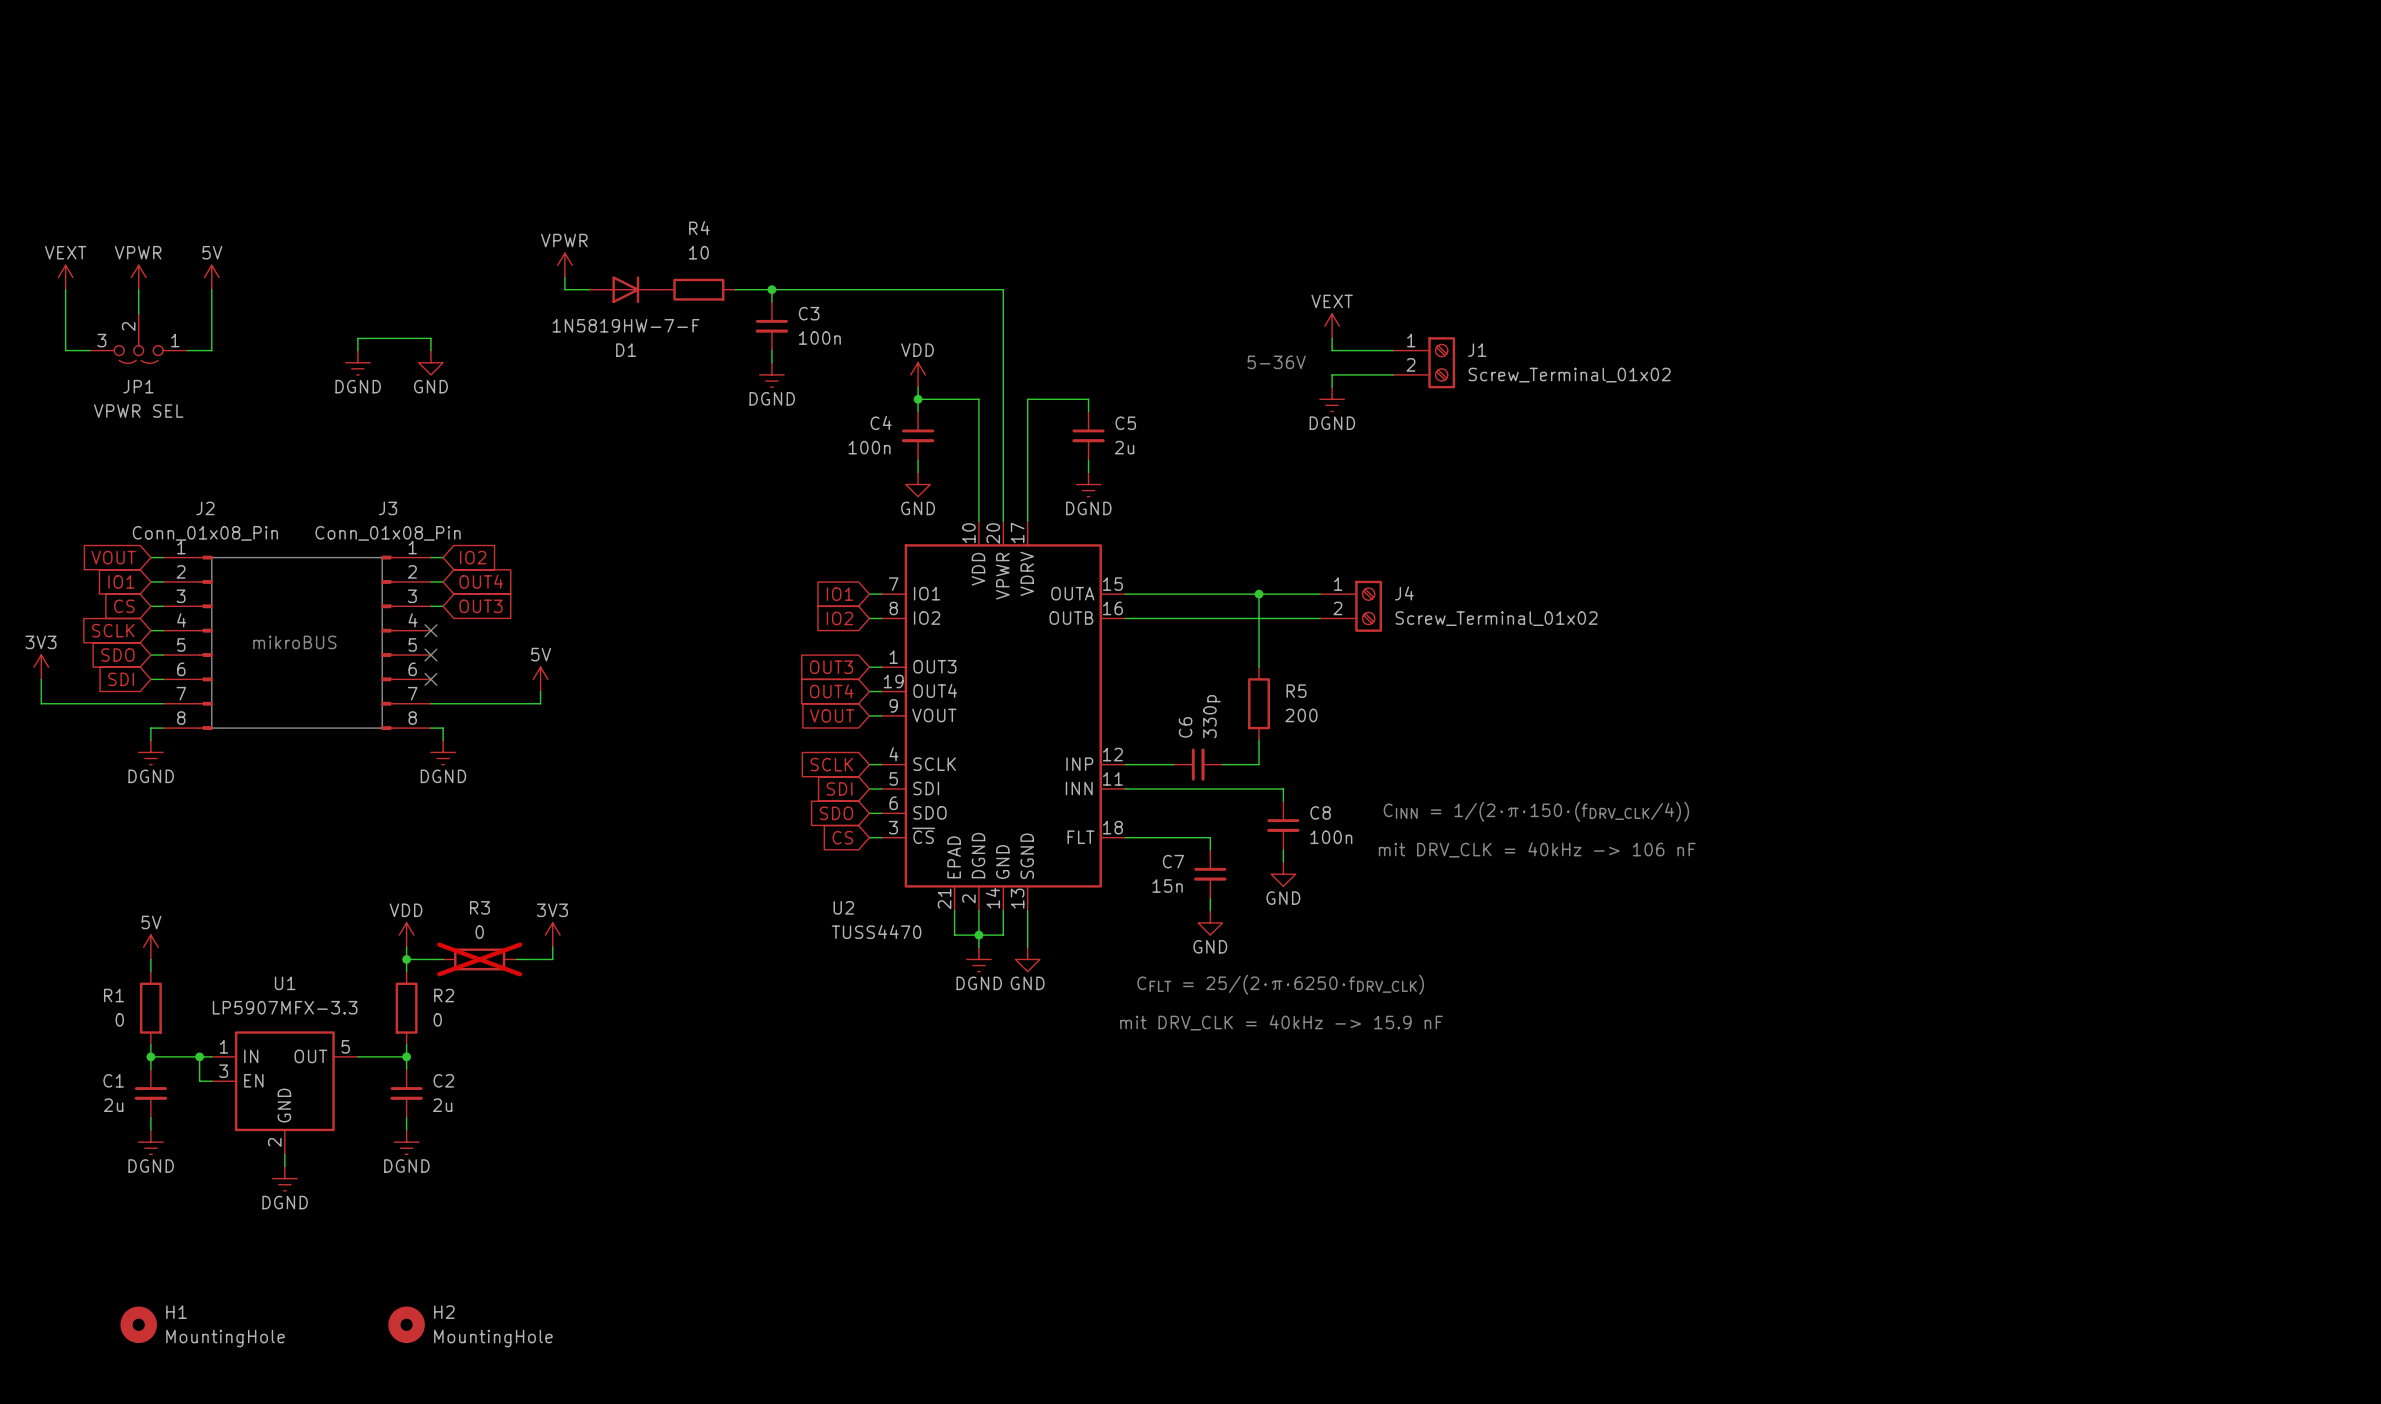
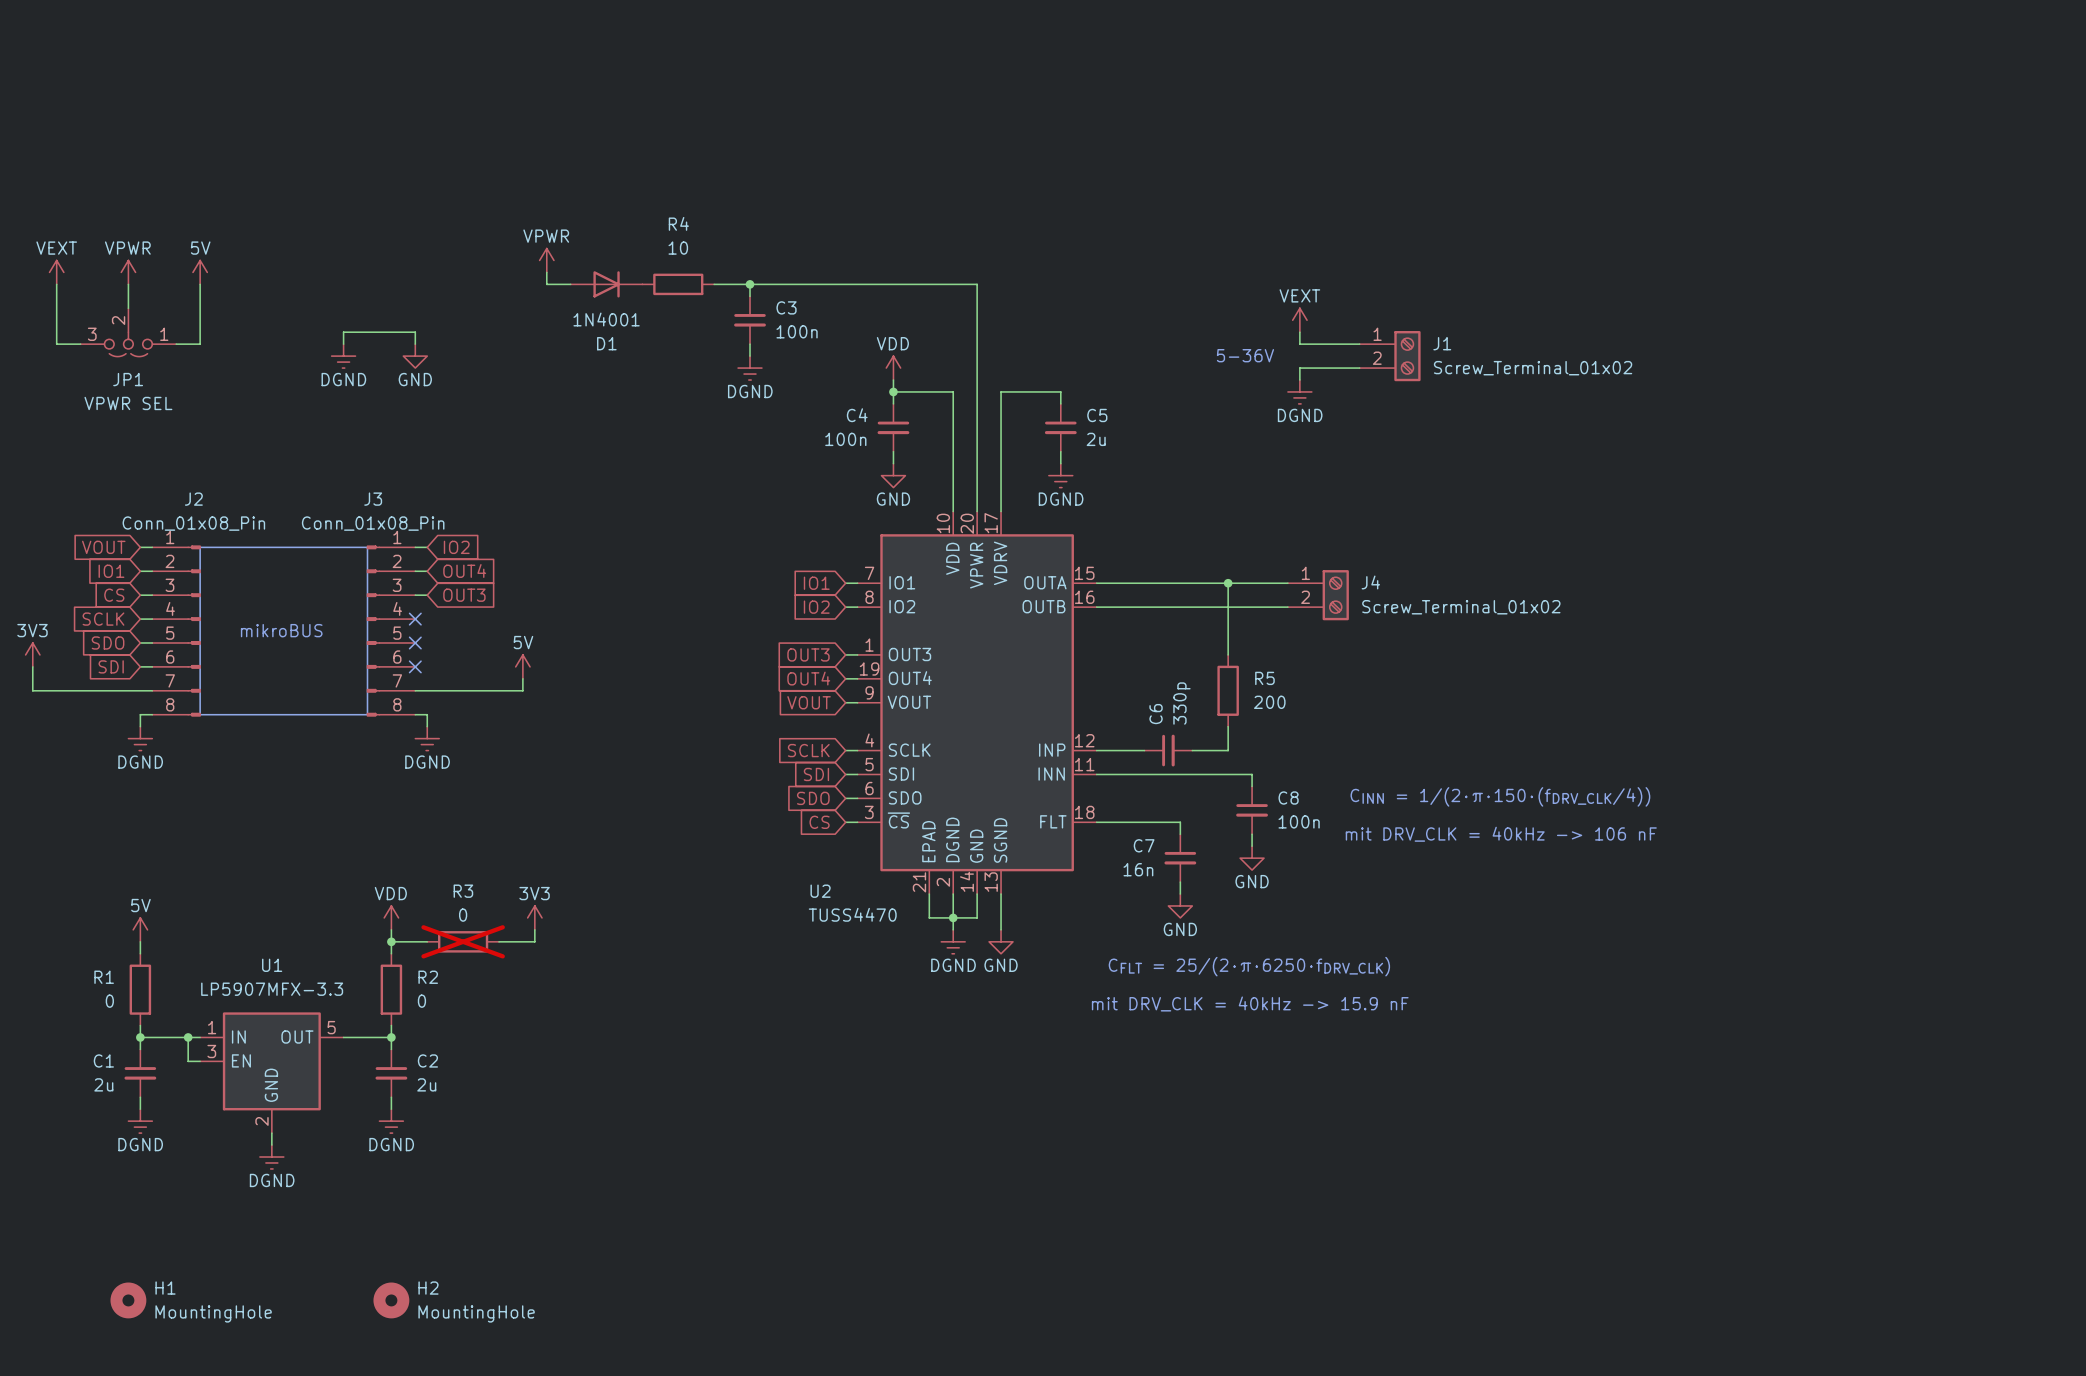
D1 value: 1N5819HW-7-F (626, 325) -> 1N4001 (606, 319)
C7 value: 15n (1167, 886) -> 16n (1138, 869)

